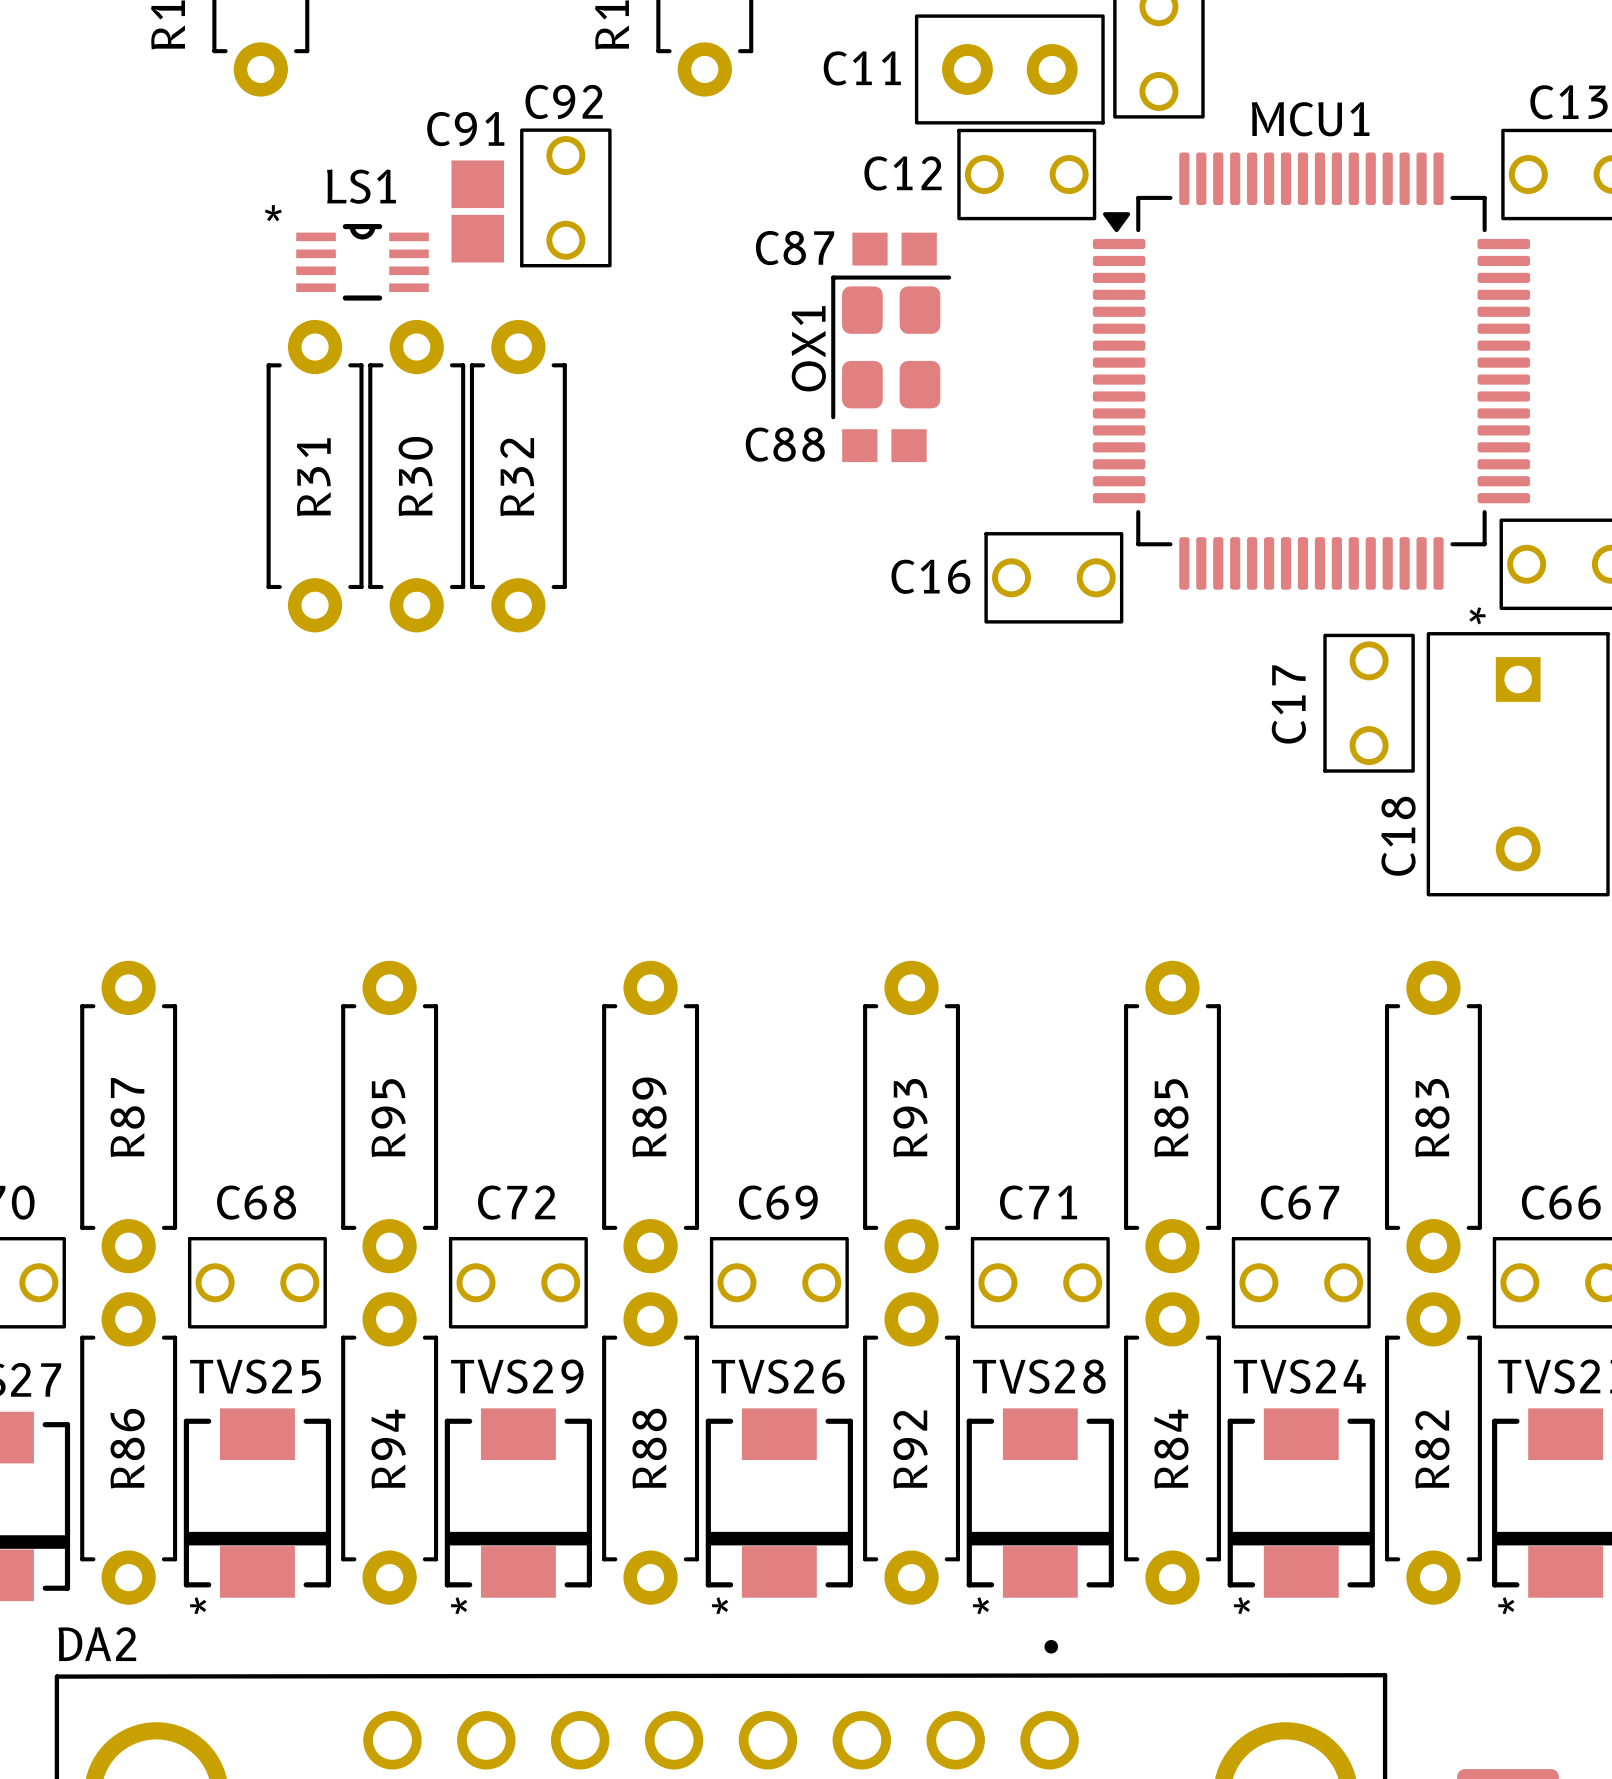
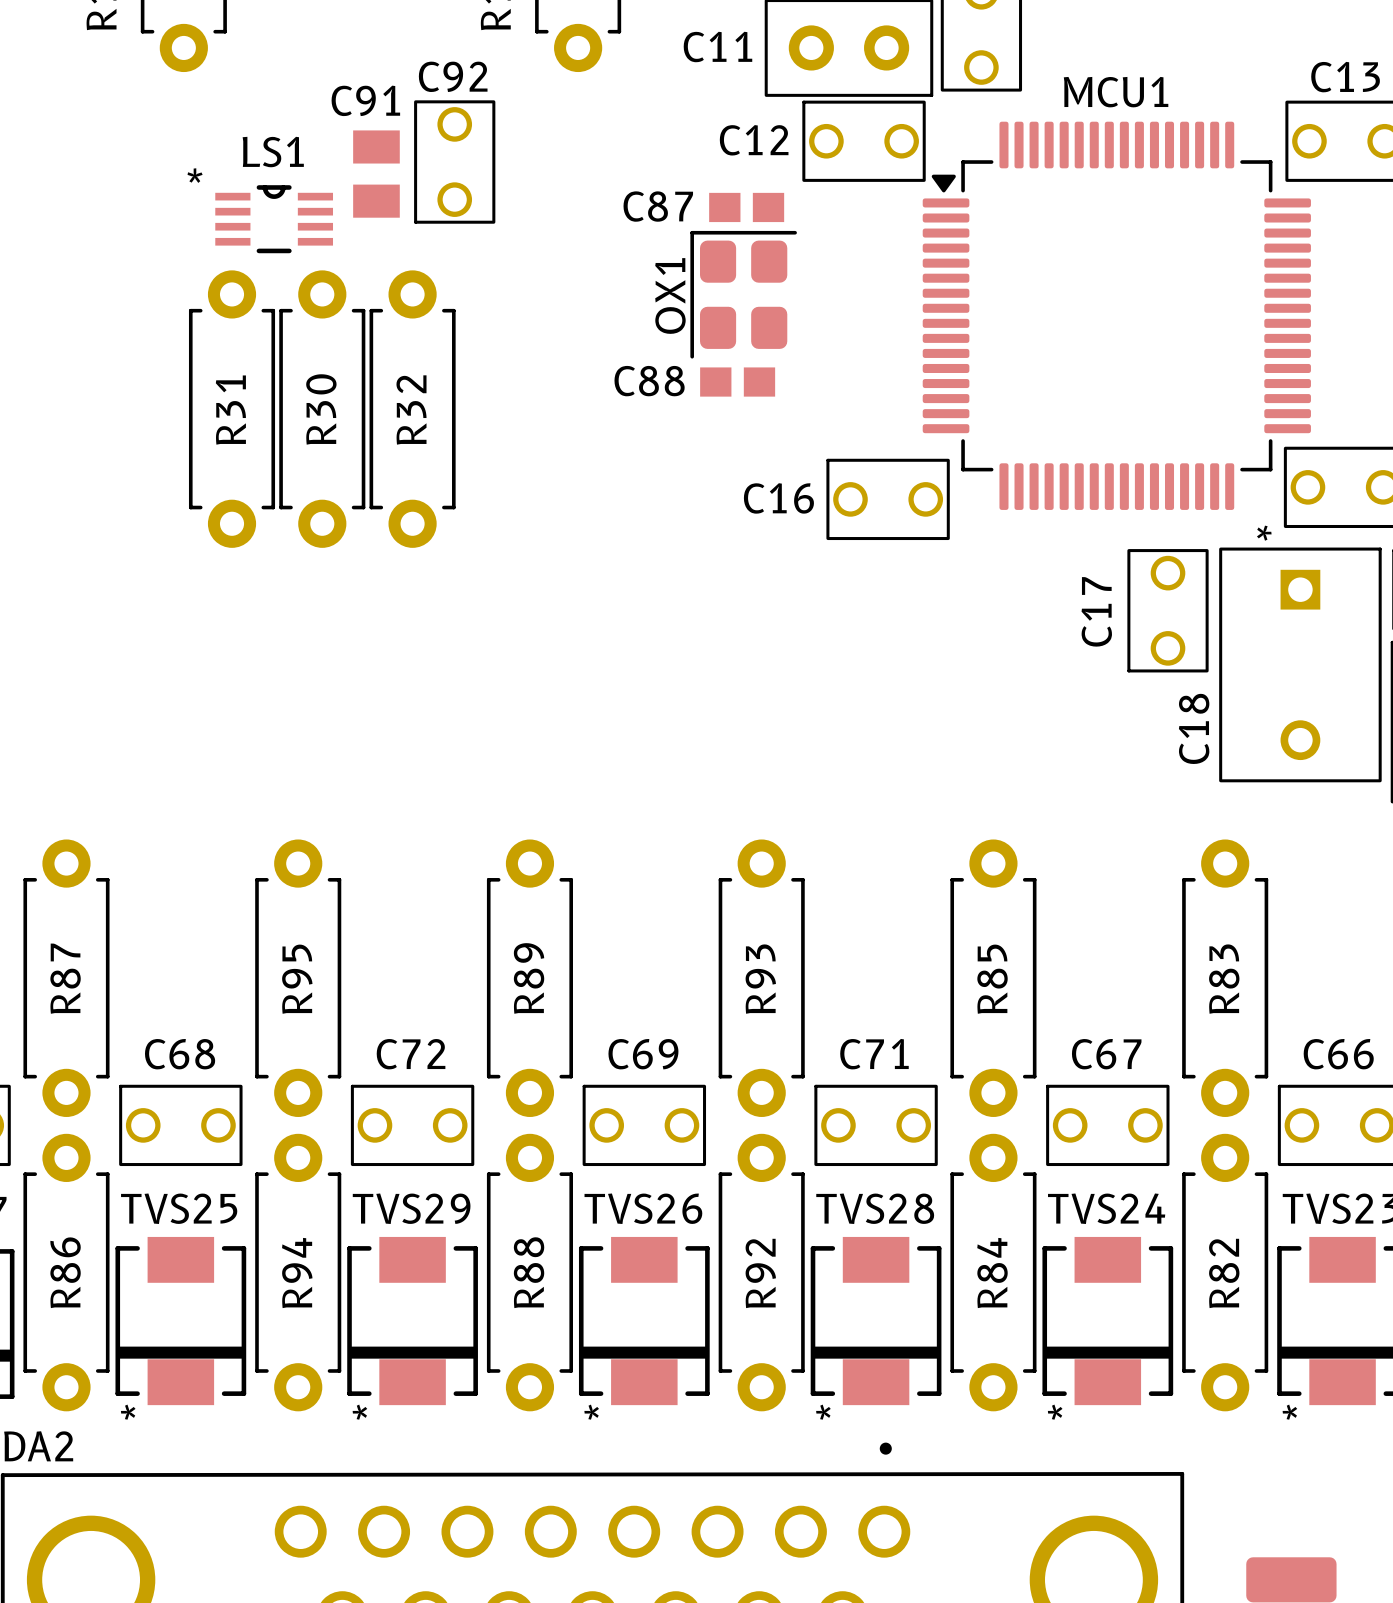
C91 footprint: [451, 160, 504, 263] -> [353, 130, 400, 218]

